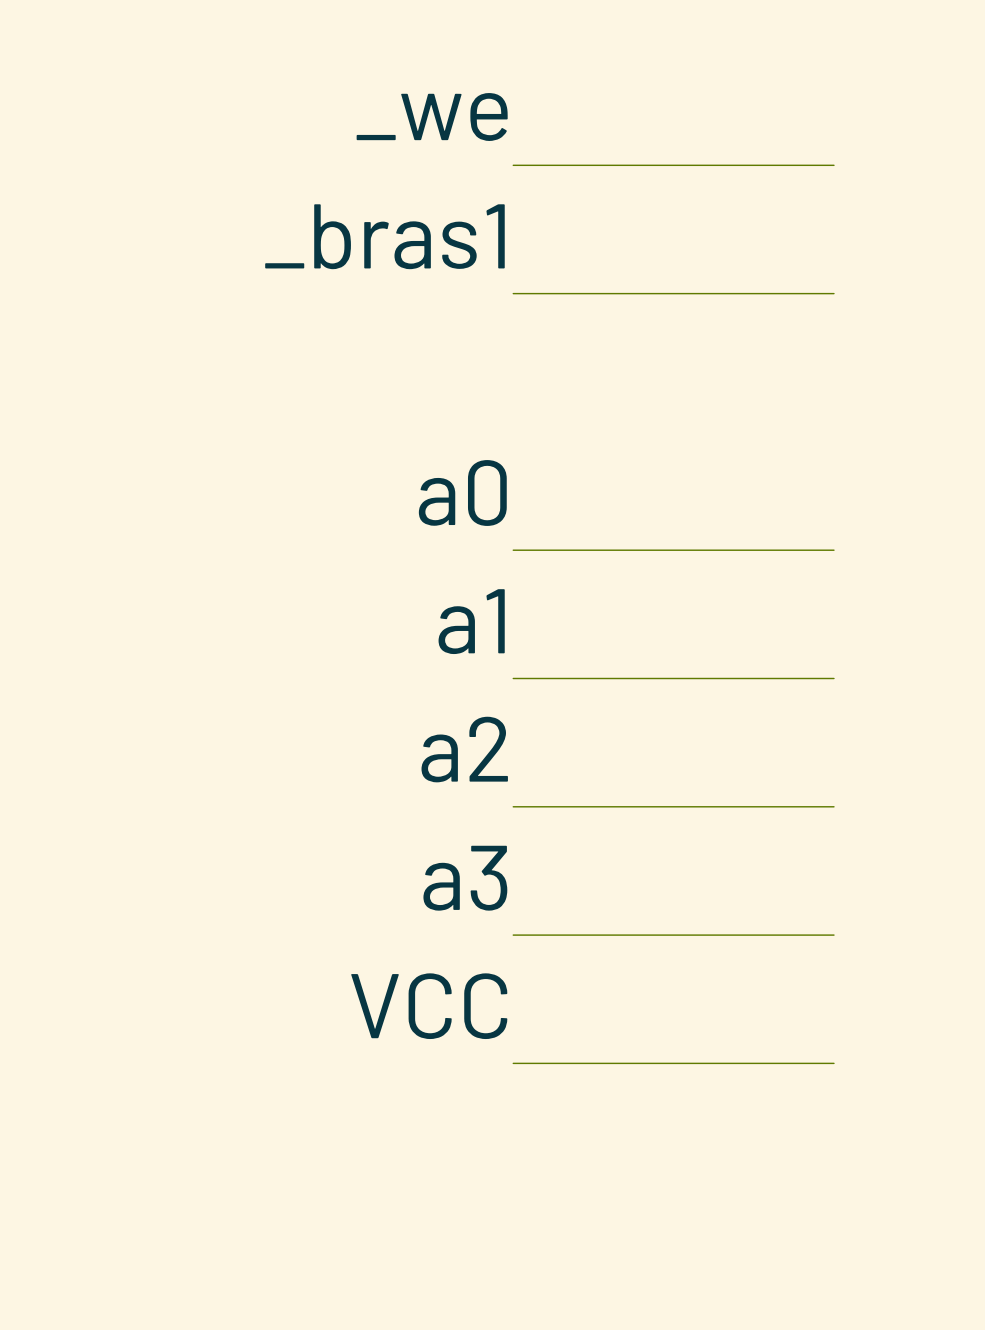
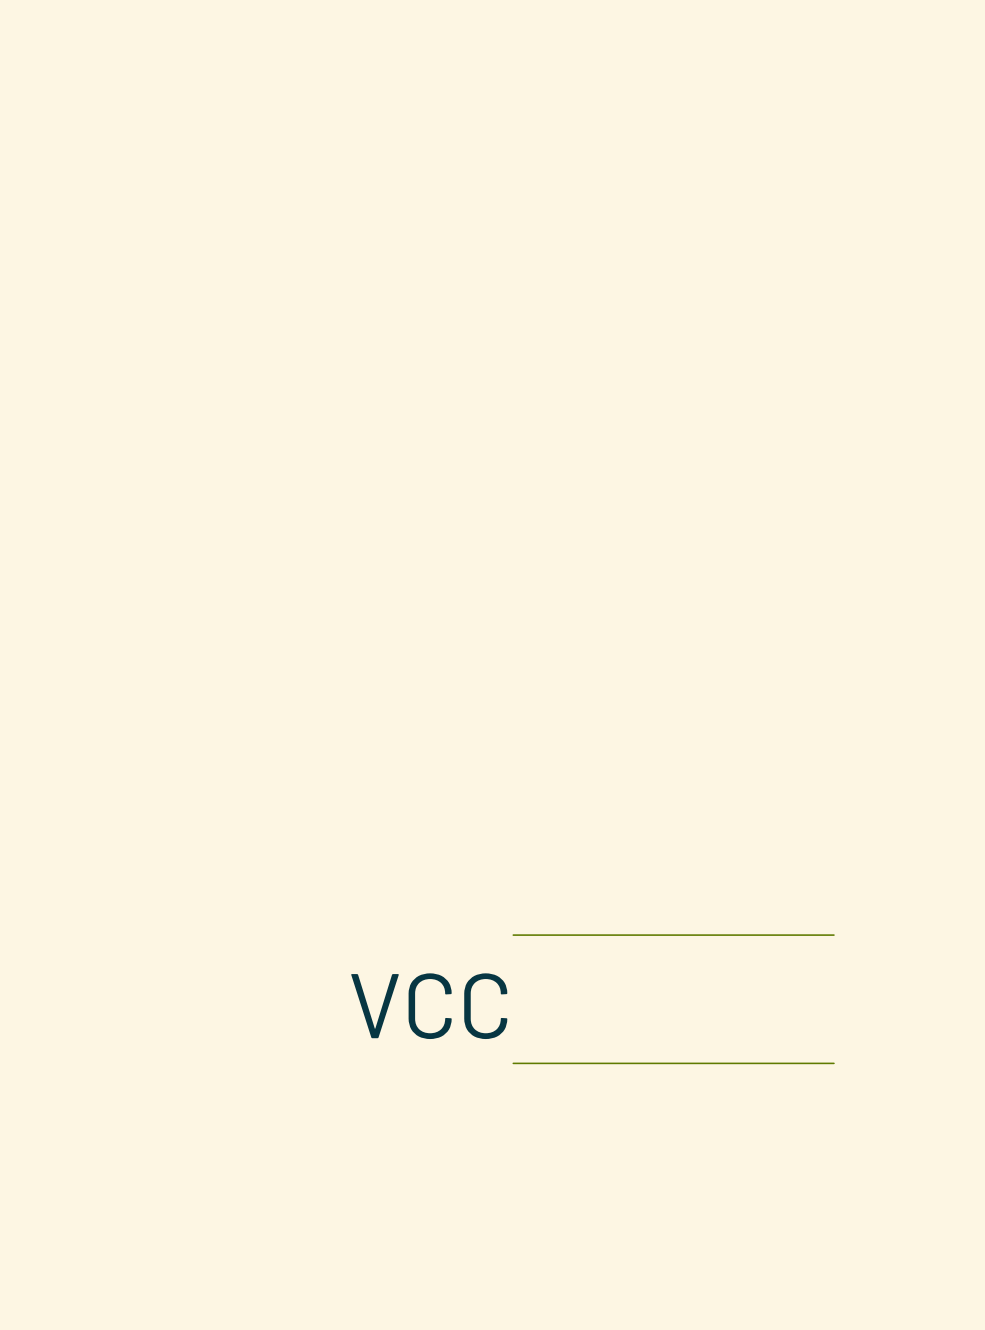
label: _we (432, 117) -> none
wire: (513, 165) (833, 165) -> none
label: _bras1 (384, 236) -> none
wire: (513, 293) (833, 293) -> none
label: a0 (462, 493) -> none
wire: (513, 550) (833, 550) -> none
label: a1 (471, 621) -> none
wire: (513, 678) (833, 678) -> none
label: a2 (464, 749) -> none
wire: (513, 806) (833, 806) -> none
label: a3 (465, 878) -> none

